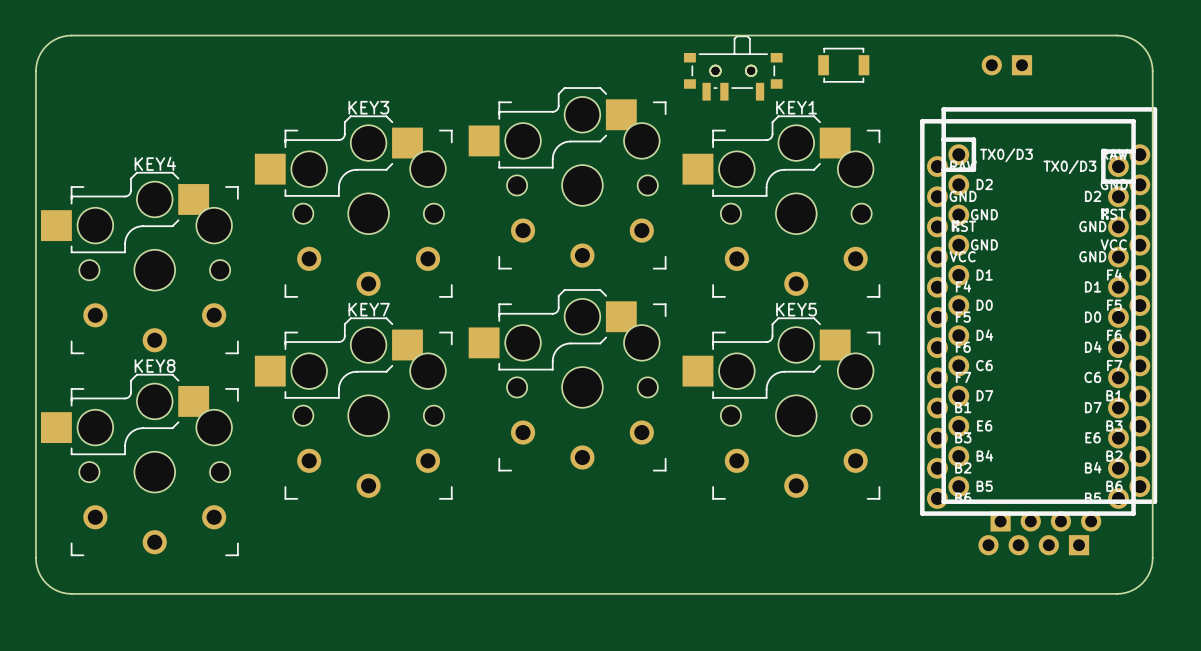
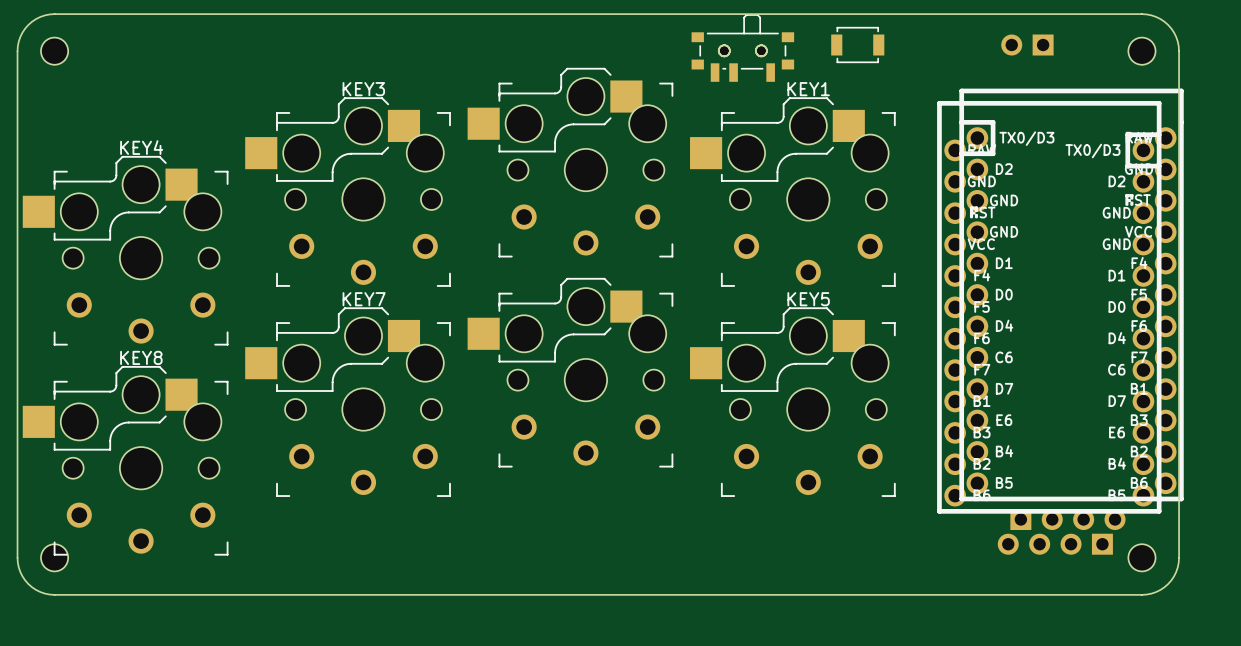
part: none -> (54, 51)
part: none -> (1141, 51)
part: none -> (54, 557)
part: none -> (1141, 557)

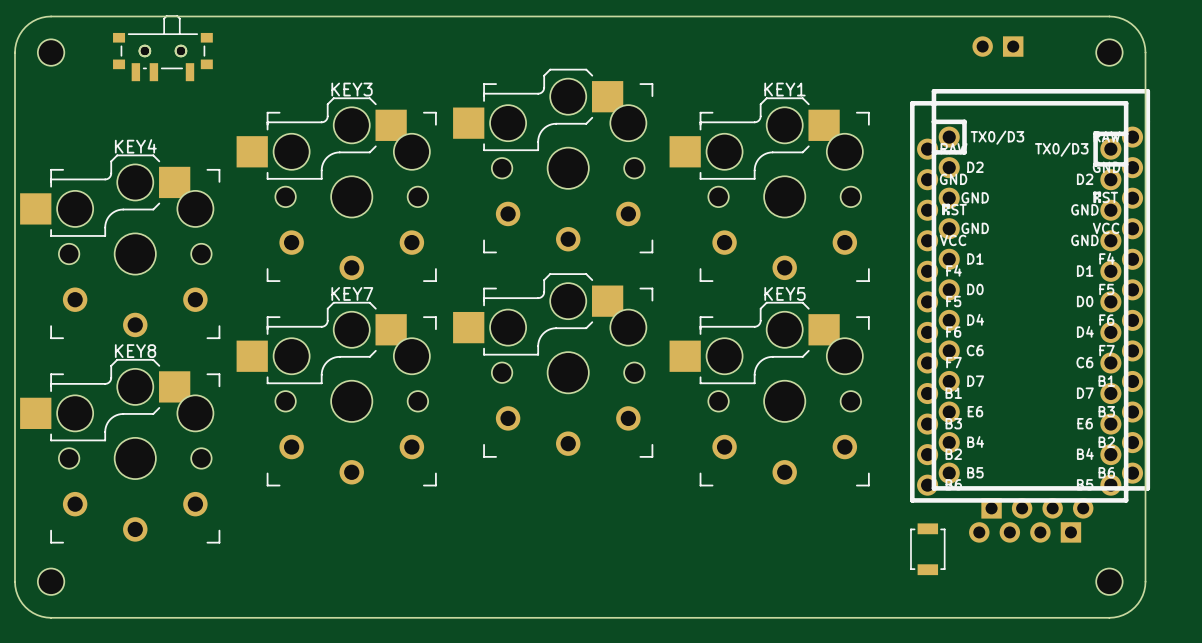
part: (857, 45) -> none
part: none -> (162, 48)
part: (742, 48) -> none
part: none -> (162, 51)
part: (742, 50) -> none
part position: (54, 557) -> (51, 581)
part position: (1141, 557) -> (1109, 581)
board edge: (1179, 557) (1176, 571) (1168, 584) (1156, 592) (1141, 594) (54, 594) (40, 592) (28, 584) (20, 571) (17, 557) -> (1145, 545) (1145, 581) (1142, 595) (1131, 610) (1114, 617) (51, 617) (33, 612) (19, 599) (15, 586) (15, 545)
part: none -> (927, 549)

